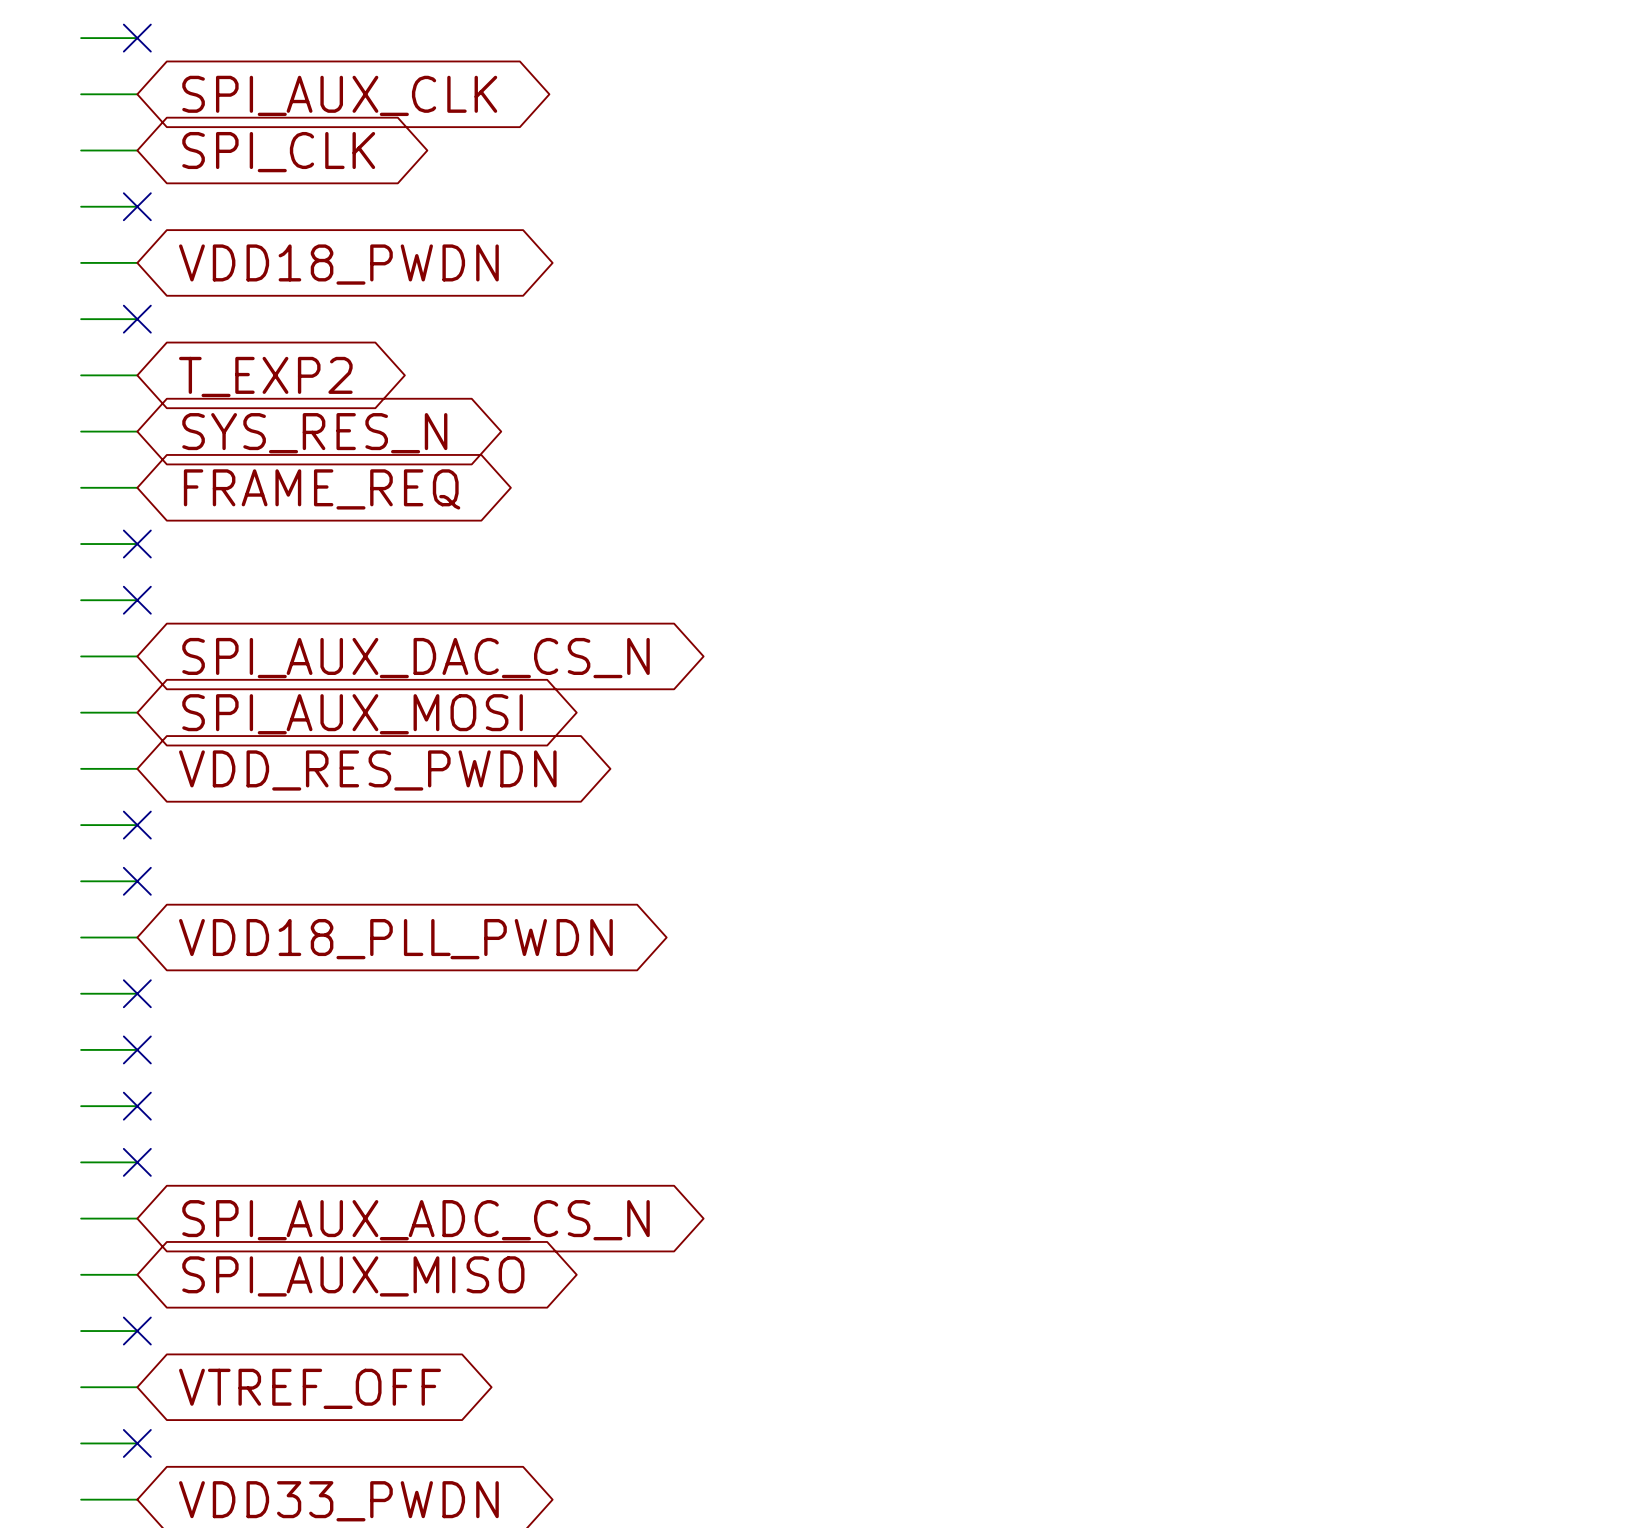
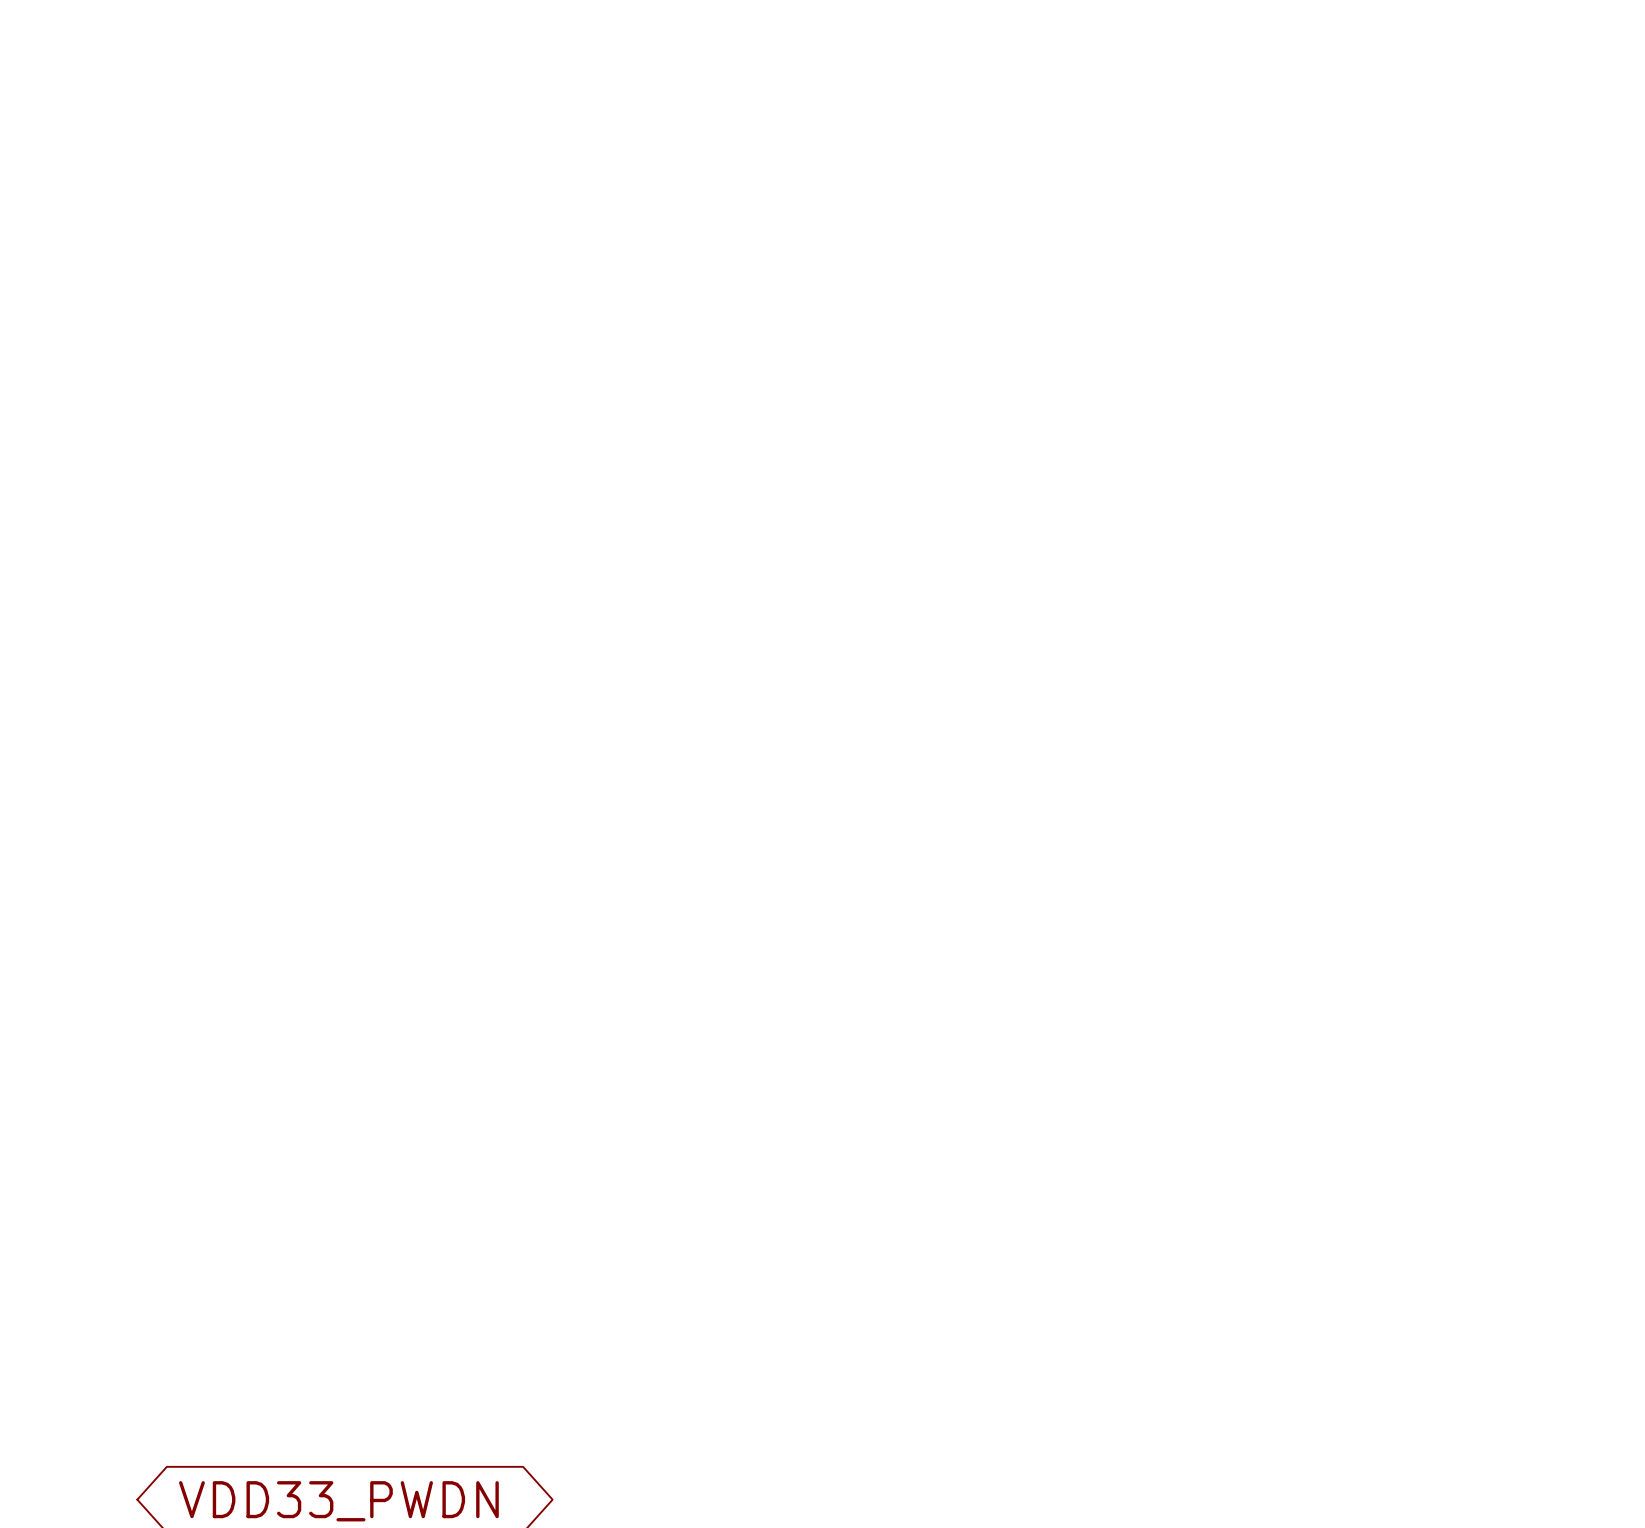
wire: (81, 38) (137, 38) -> none
no-connect mark: (137, 38) -> none
wire: (81, 94) (137, 94) -> none
global label: SPI_AUX_CLK (339, 95) -> none
wire: (81, 150) (137, 150) -> none
global label: SPI_CLK (278, 152) -> none
wire: (81, 206) (137, 206) -> none
no-connect mark: (137, 206) -> none
wire: (81, 262) (137, 262) -> none
global label: VDD18_PWDN (338, 264) -> none
wire: (81, 319) (137, 319) -> none
no-connect mark: (137, 319) -> none
wire: (81, 375) (137, 375) -> none
global label: T_EXP2 (265, 376) -> none
wire: (81, 431) (137, 431) -> none
global label: SYS_RES_N (314, 433) -> none
wire: (81, 487) (137, 487) -> none
global label: FRAME_REQ (322, 489) -> none
wire: (81, 544) (137, 544) -> none
no-connect mark: (137, 544) -> none
wire: (81, 600) (137, 600) -> none
no-connect mark: (137, 600) -> none
wire: (81, 656) (137, 656) -> none
global label: SPI_AUX_DAC_CS_N (416, 658) -> none
wire: (81, 712) (137, 712) -> none
global label: SPI_AUX_MOSI (352, 714) -> none
wire: (81, 768) (137, 768) -> none
global label: VDD_RES_PWDN (367, 770) -> none
wire: (81, 825) (137, 825) -> none
no-connect mark: (137, 825) -> none
wire: (81, 881) (137, 881) -> none
no-connect mark: (137, 881) -> none
wire: (81, 937) (137, 937) -> none
global label: VDD18_PLL_PWDN (395, 939) -> none
wire: (81, 993) (137, 993) -> none
no-connect mark: (137, 993) -> none
wire: (81, 1049) (137, 1049) -> none
no-connect mark: (137, 1049) -> none
wire: (81, 1106) (137, 1106) -> none
no-connect mark: (137, 1106) -> none
wire: (81, 1162) (137, 1162) -> none
no-connect mark: (137, 1162) -> none
wire: (81, 1218) (137, 1218) -> none
global label: SPI_AUX_ADC_CS_N (416, 1220) -> none
wire: (81, 1274) (137, 1274) -> none
global label: SPI_AUX_MISO (353, 1276) -> none
wire: (81, 1331) (137, 1331) -> none
no-connect mark: (137, 1331) -> none
wire: (81, 1387) (137, 1387) -> none
global label: VTREF_OFF (310, 1388) -> none
wire: (81, 1443) (137, 1443) -> none
no-connect mark: (137, 1443) -> none
wire: (81, 1499) (137, 1499) -> none

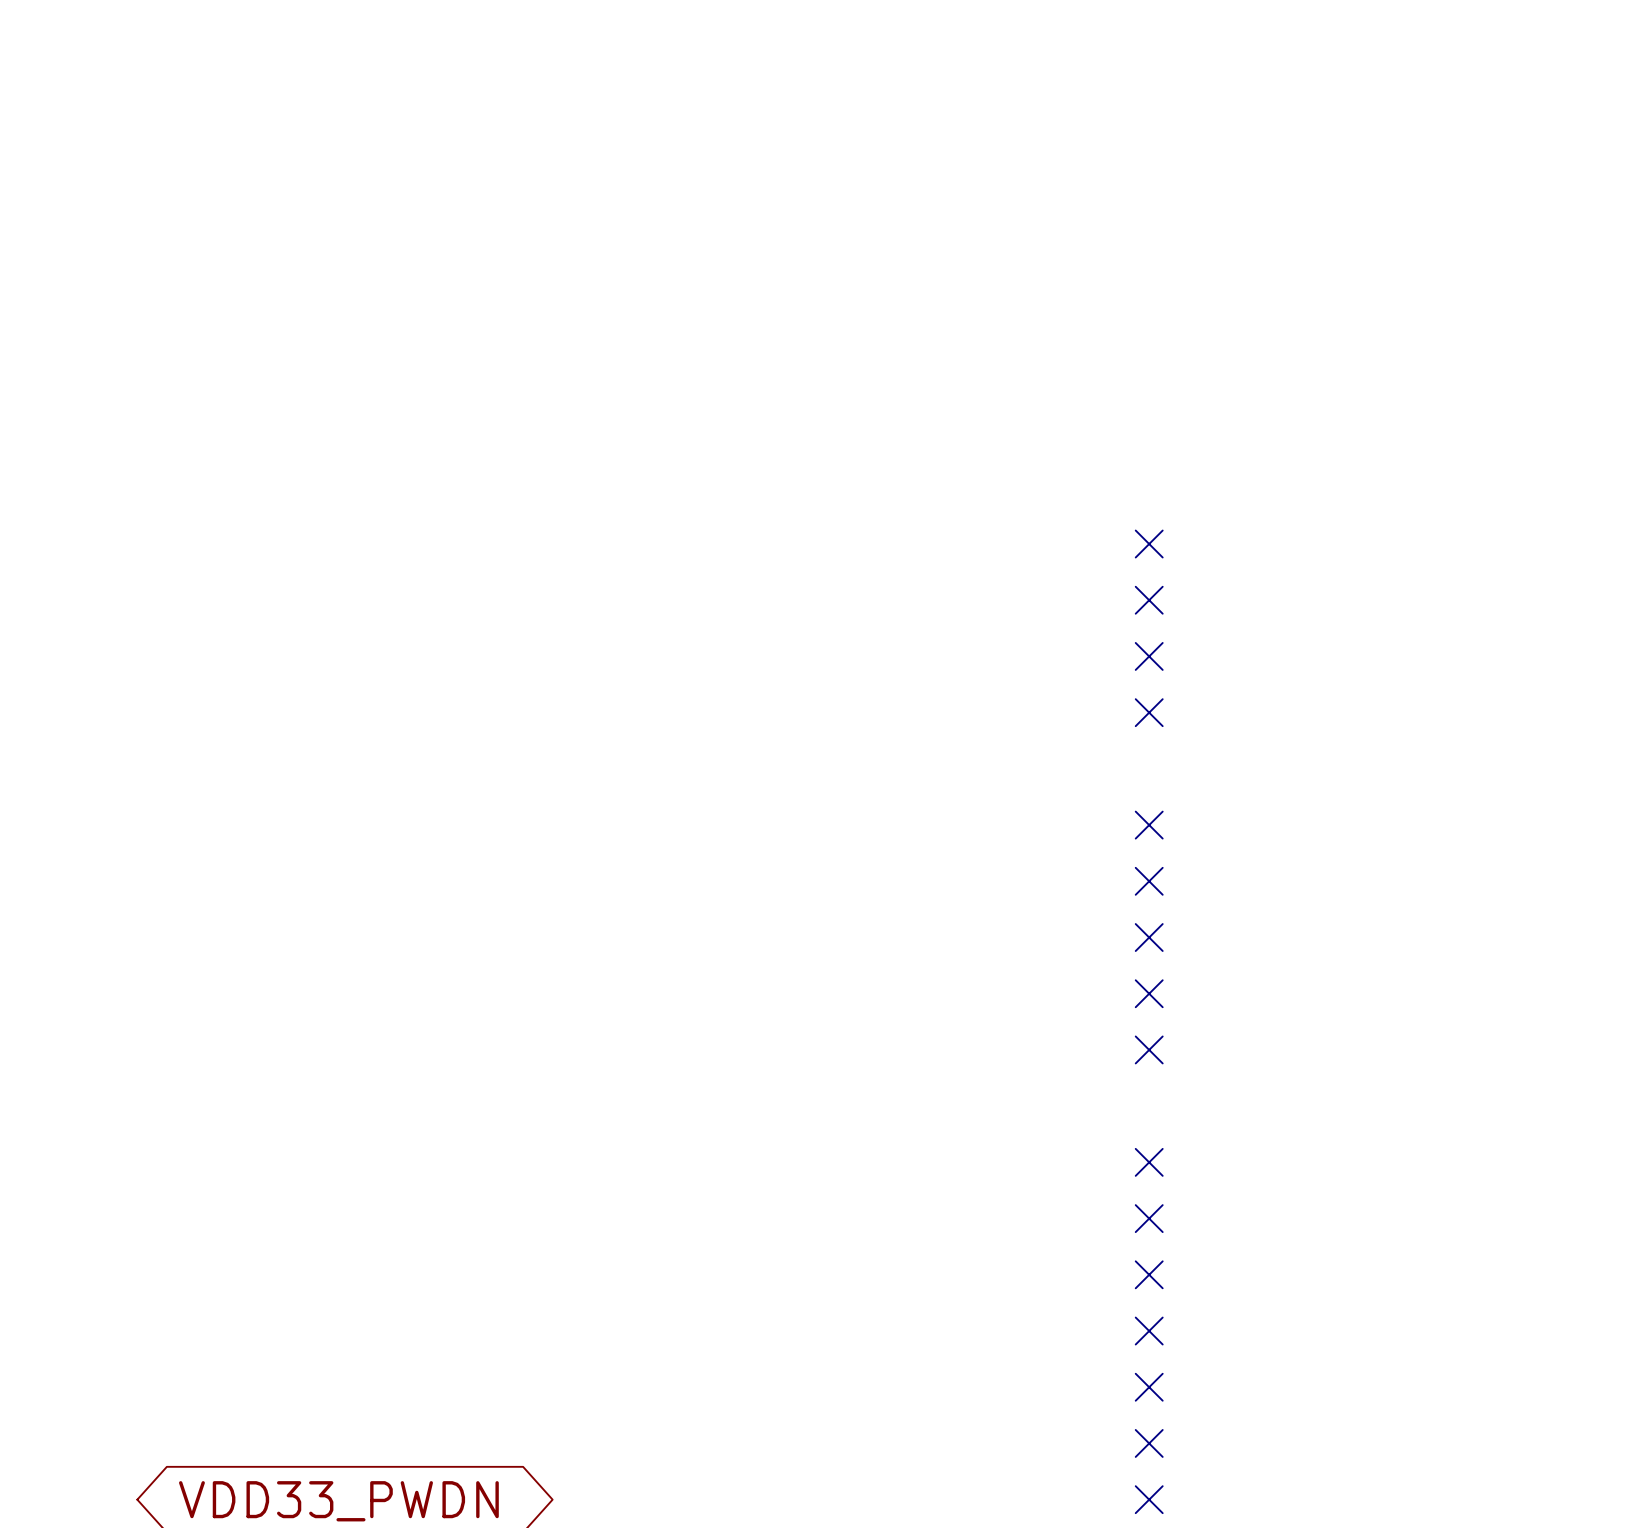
no-connect mark: none -> (1149, 544)
no-connect mark: none -> (1149, 600)
no-connect mark: none -> (1149, 656)
no-connect mark: none -> (1149, 712)
no-connect mark: none -> (1149, 825)
no-connect mark: none -> (1149, 881)
no-connect mark: none -> (1149, 937)
no-connect mark: none -> (1149, 993)
no-connect mark: none -> (1149, 1049)
no-connect mark: none -> (1149, 1162)
no-connect mark: none -> (1149, 1218)
no-connect mark: none -> (1149, 1274)
no-connect mark: none -> (1149, 1331)
no-connect mark: none -> (1149, 1387)
no-connect mark: none -> (1149, 1443)
no-connect mark: none -> (1149, 1499)

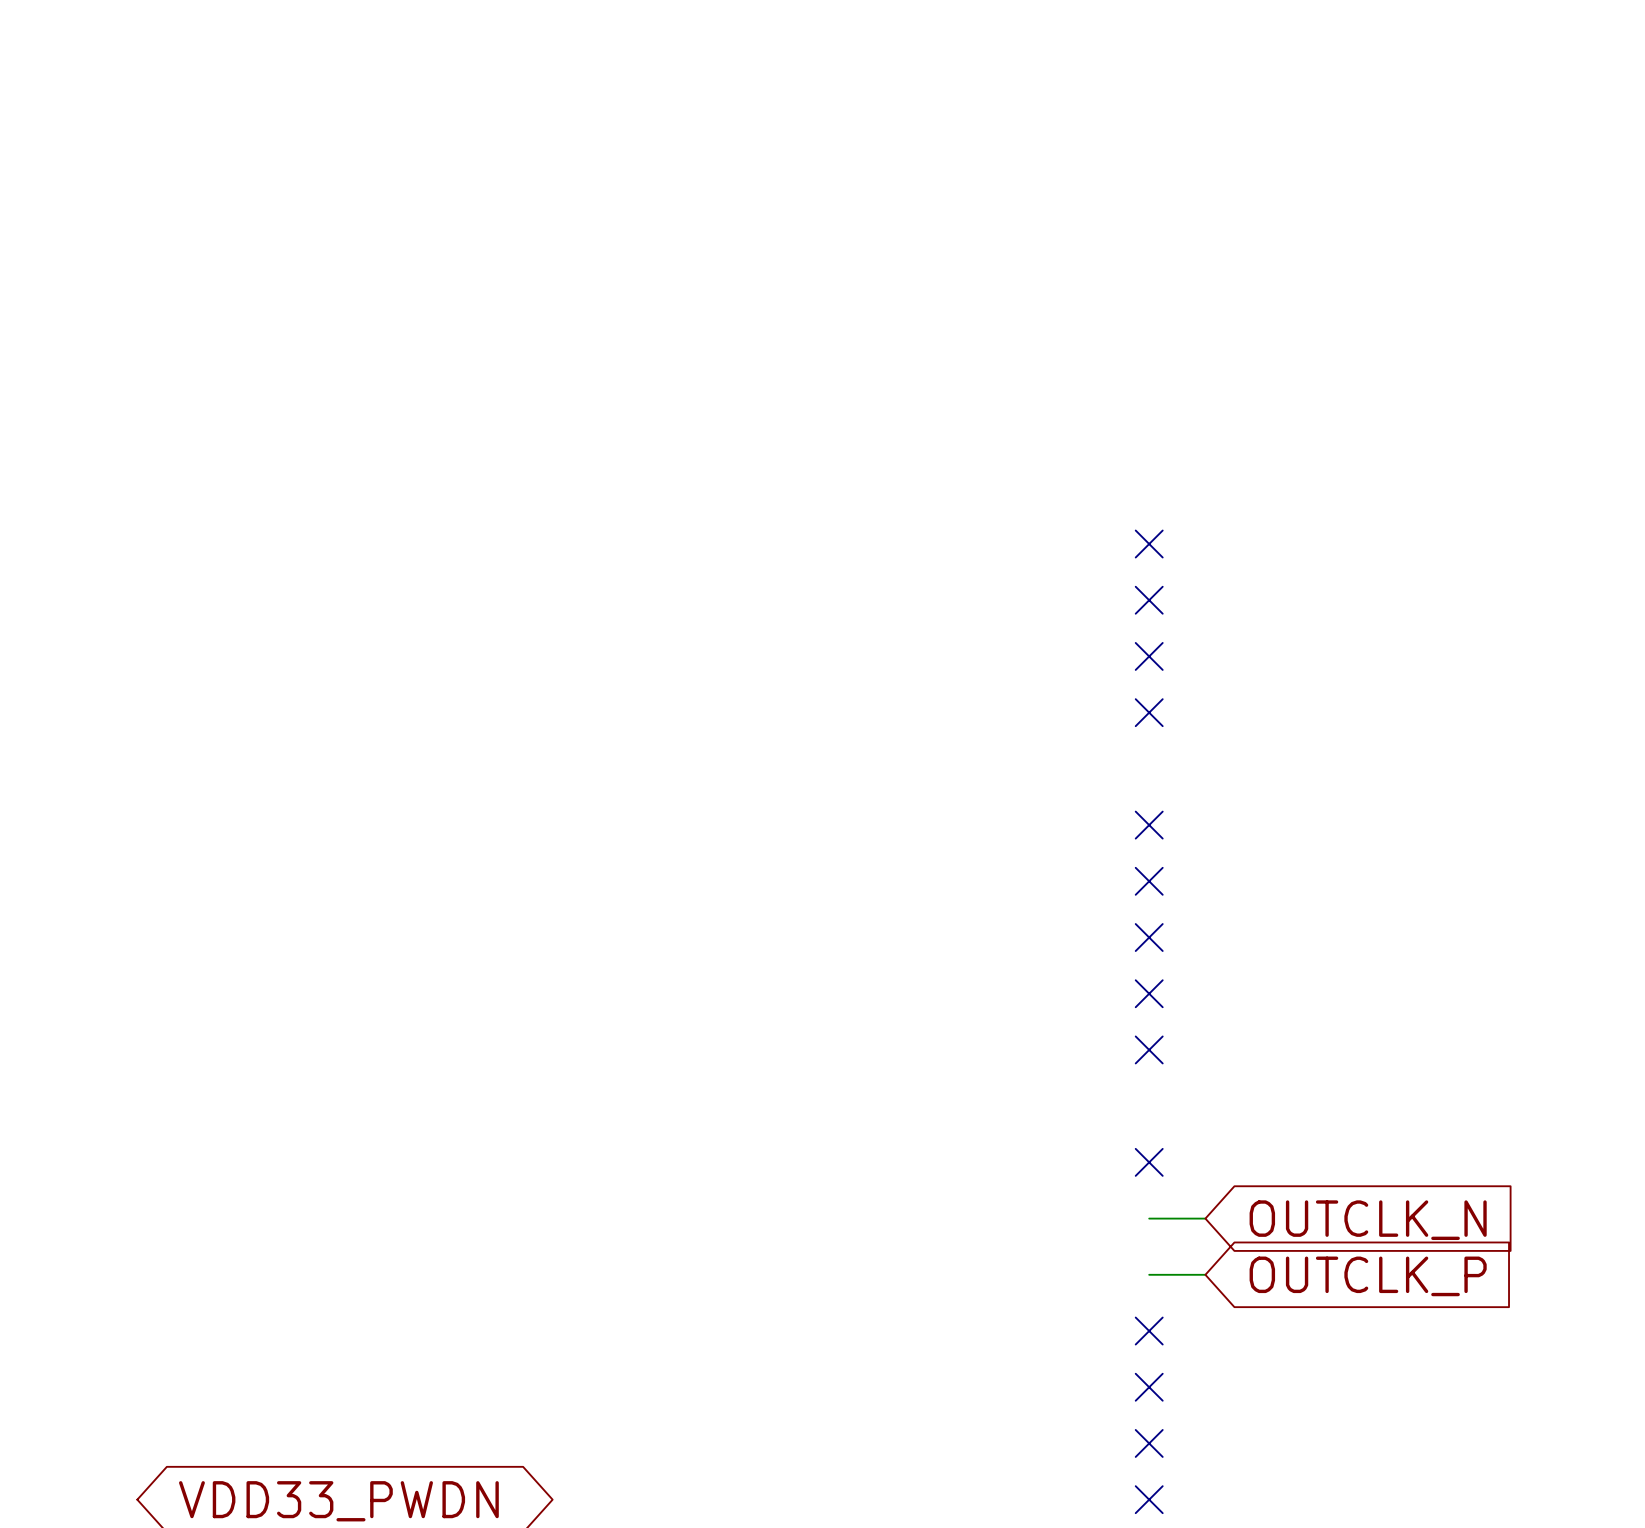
wire: none -> (1149, 1218) (1205, 1218)
no-connect mark: (1149, 1218) -> none
global label: none -> OUTCLK_N (1368, 1220)
wire: none -> (1149, 1274) (1205, 1274)
no-connect mark: (1149, 1274) -> none
global label: none -> OUTCLK_P (1368, 1276)

